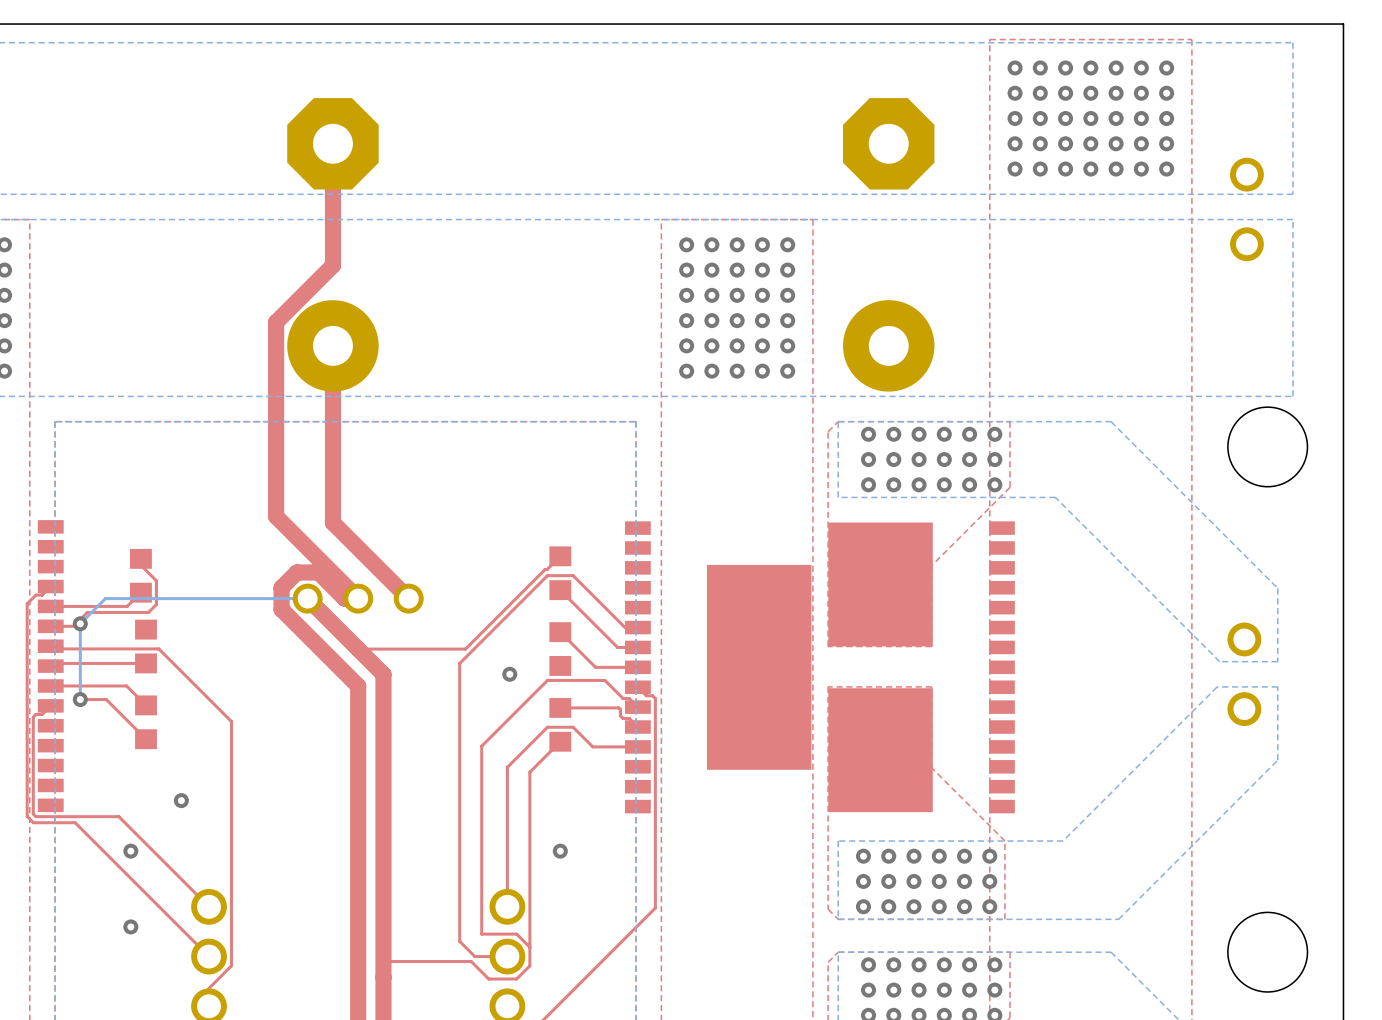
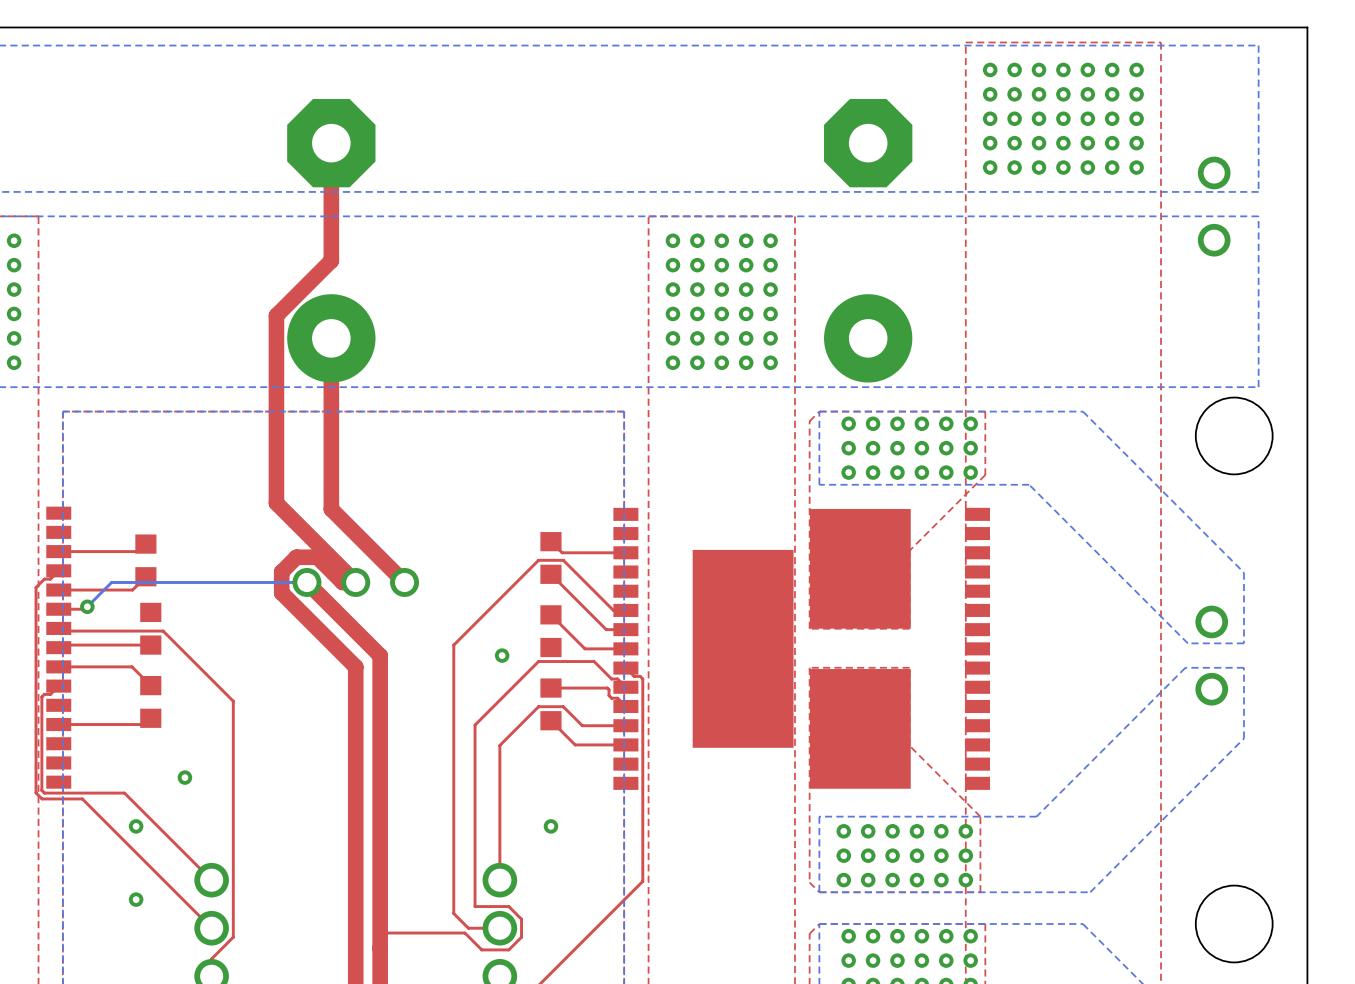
top track: (560, 556) (465, 649) (358, 649) -> (550, 541) (562, 552) (625, 552)
top track: (140, 558) (140, 565) (156, 580) (156, 604) (148, 612) (87, 612) (80, 619) (80, 623) -> (145, 544) (138, 551) (58, 551)
bottom track: (80, 623) (80, 699) -> none
top track: (80, 699) (106, 699) (146, 739) -> (58, 724) (144, 724) (150, 718)
via: (80, 699) -> none
top track: (560, 741) (529, 772) (529, 947) -> (550, 720) (575, 744) (625, 744)

